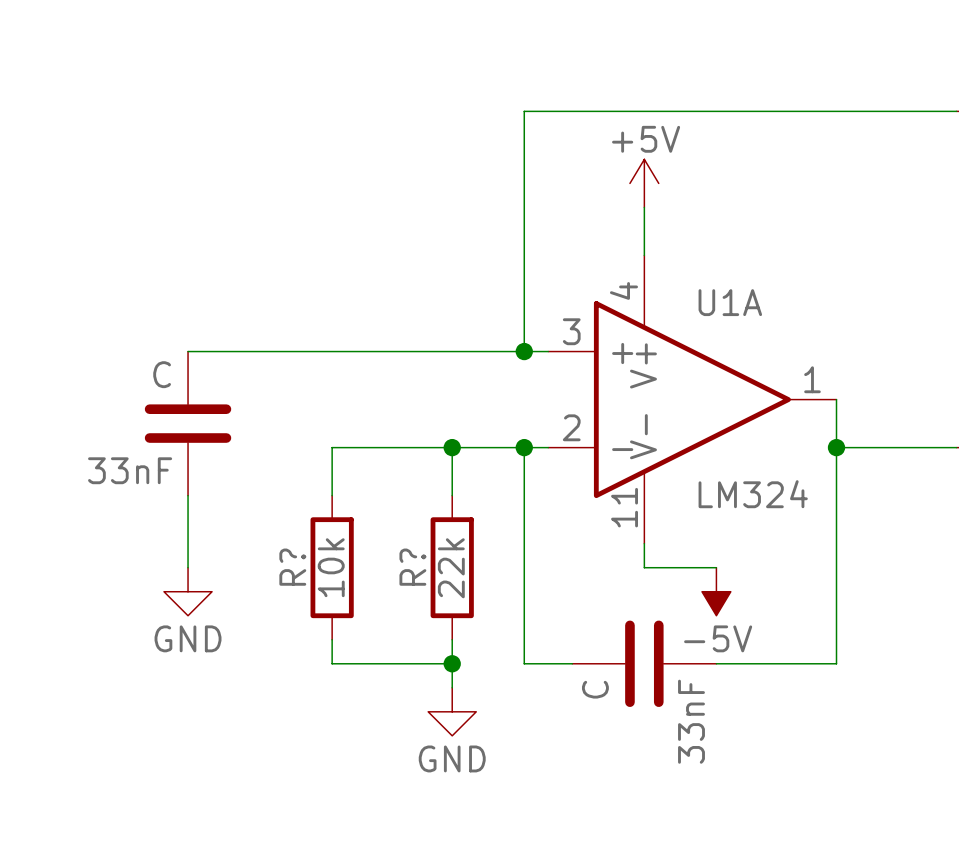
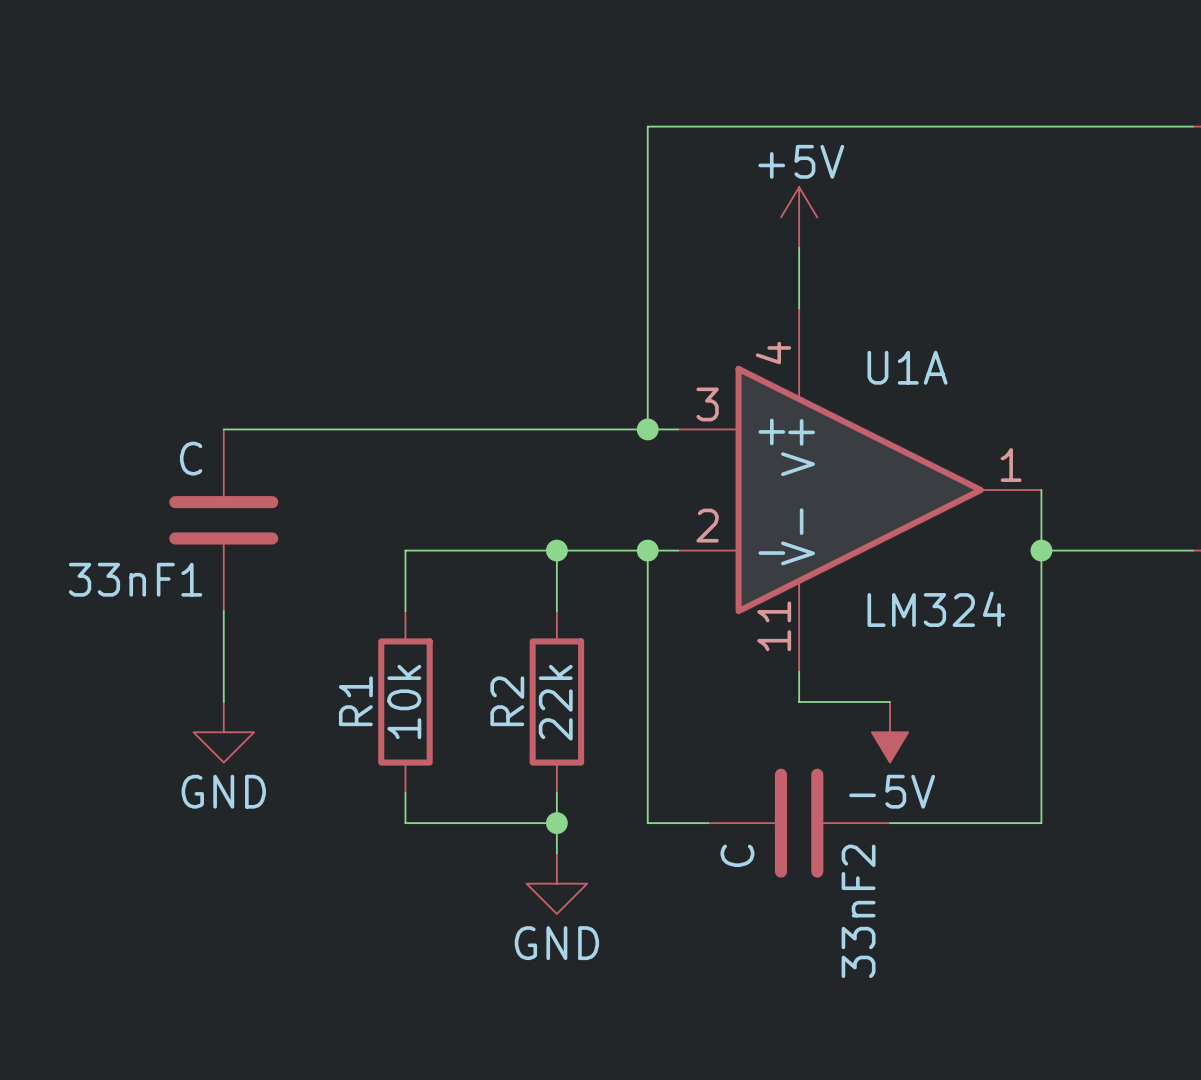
33nF name: 33nF (130, 470) -> 33nF1 (135, 579)
R? name: R? (292, 567) -> R1 (355, 701)
R? name: R? (412, 567) -> R2 (507, 701)
33nF name: 33nF (691, 721) -> 33nF2 (858, 911)

